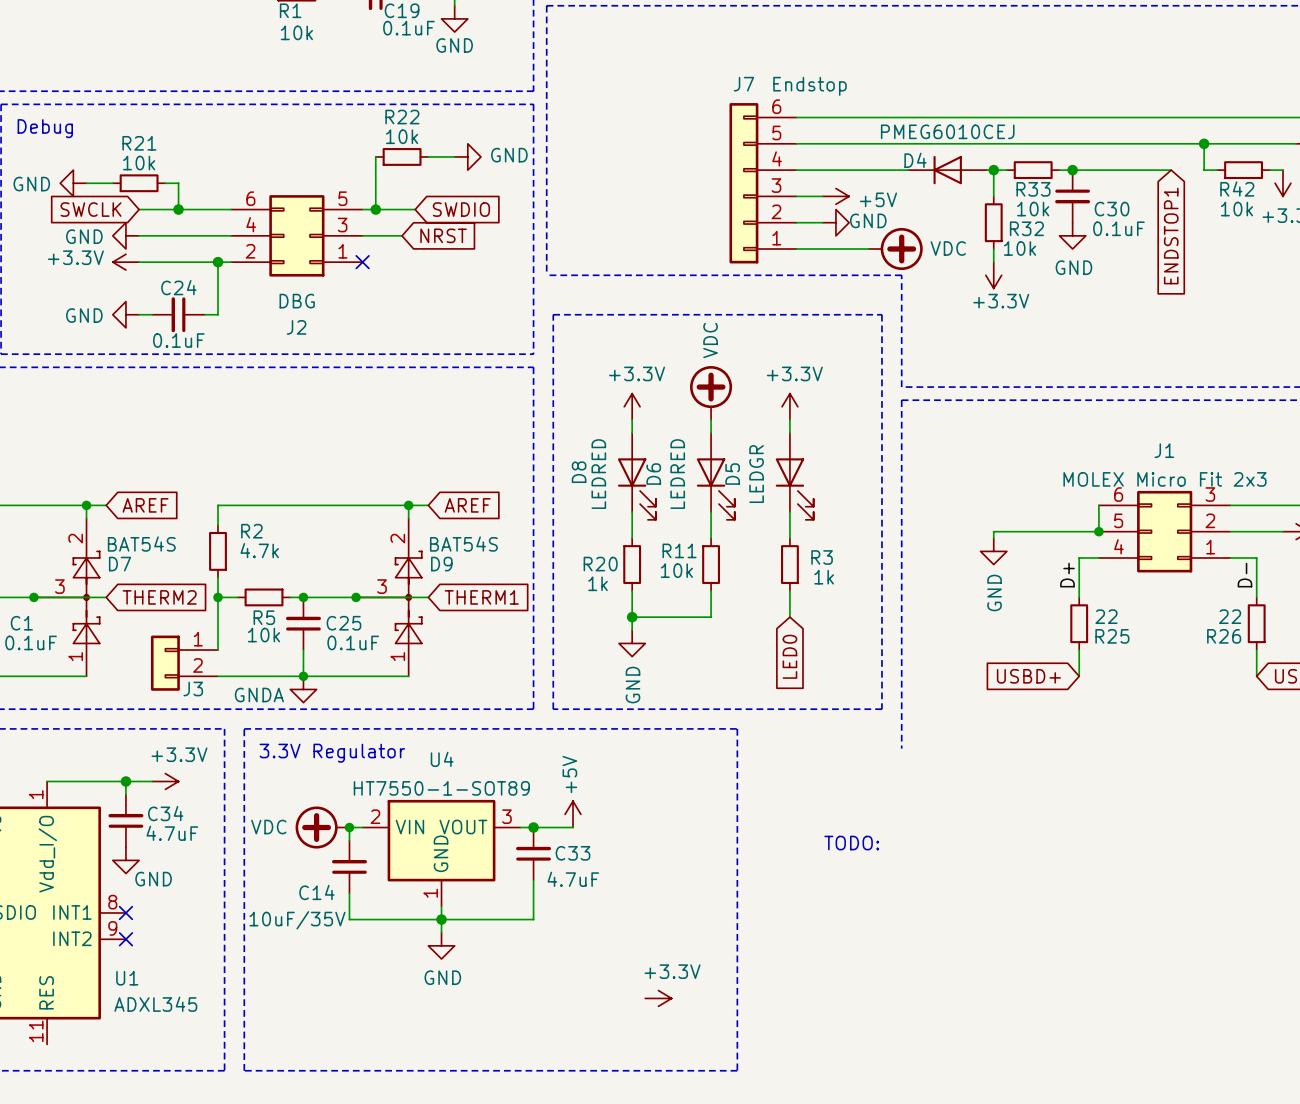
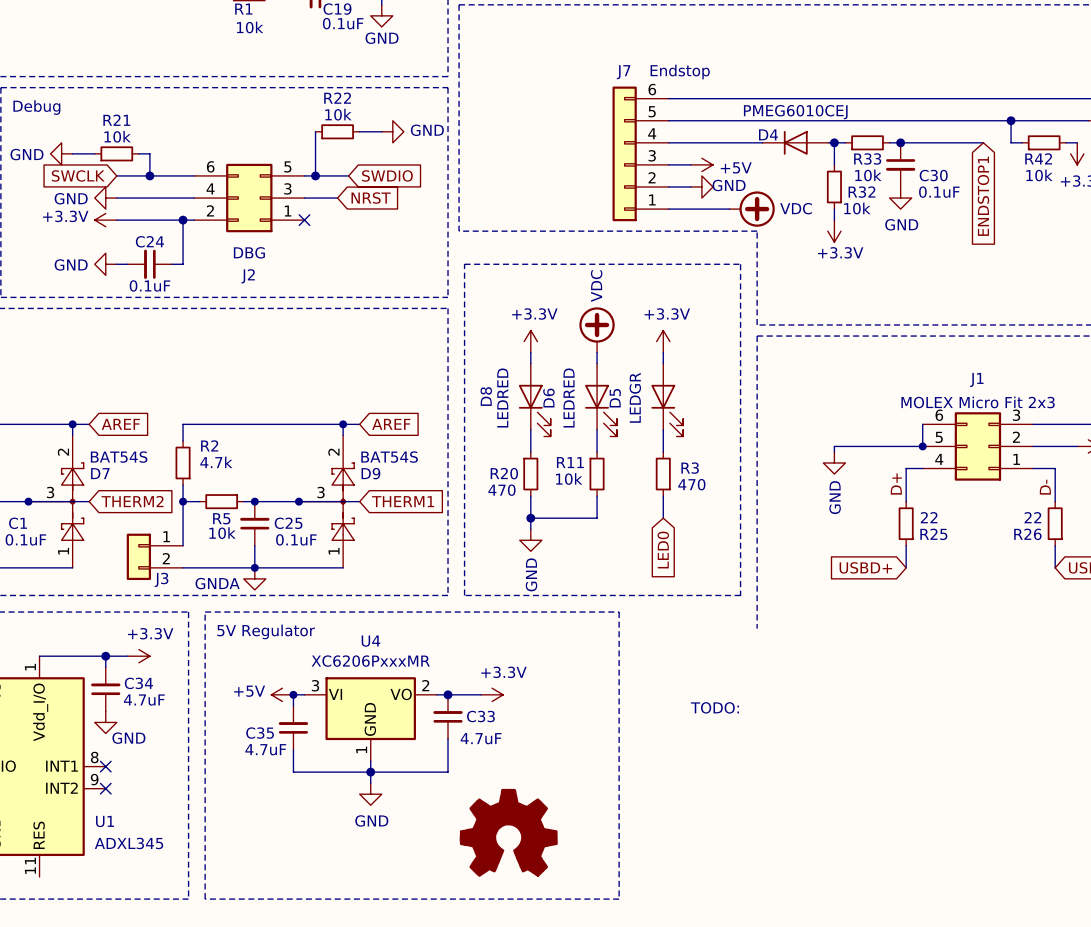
R3 value: 1k (824, 577) -> 470 (691, 484)
R20 value: 1k (597, 583) -> 470 (501, 490)
text: 3.3V Regulator (332, 753) -> 5V Regulator (266, 631)
U4 value: HT7550-1-SOT89 (441, 788) -> XC6206PxxxMR (370, 661)
U4 symbol: [362, 799, 521, 907] -> [304, 677, 437, 762]
power symbol rotation: 0° (573, 814) -> 90° counterclockwise (282, 694)
power symbol position: +5V (573, 814) -> +5V (282, 694)
power symbol: VDC (322, 827) -> none
C14 name: C14 (316, 892) -> C35 (260, 733)
C14 value: 10uF/35V (297, 920) -> 4.7uF (265, 749)
part: none -> (508, 832)
power symbol position: +3.3V (658, 998) -> +3.3V (492, 694)

